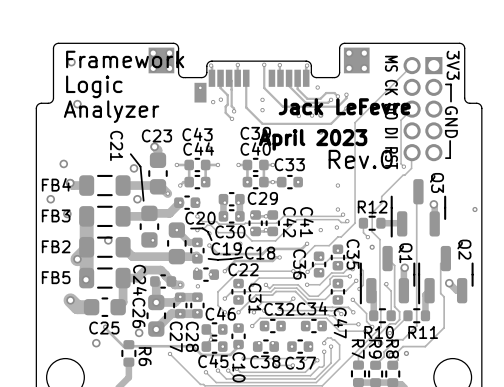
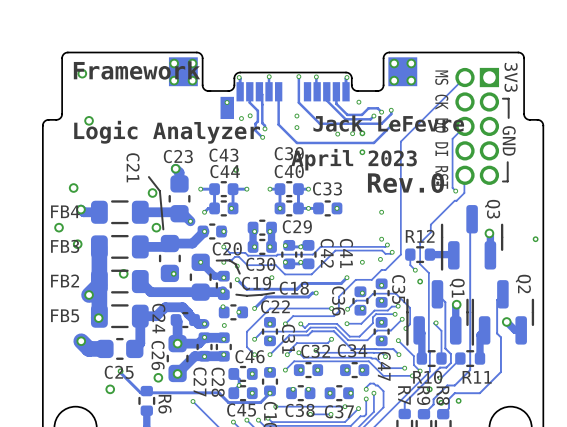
text: Logic (94, 86) -> none
text: Analyzer (111, 111) -> Logic Analyzer (167, 132)

